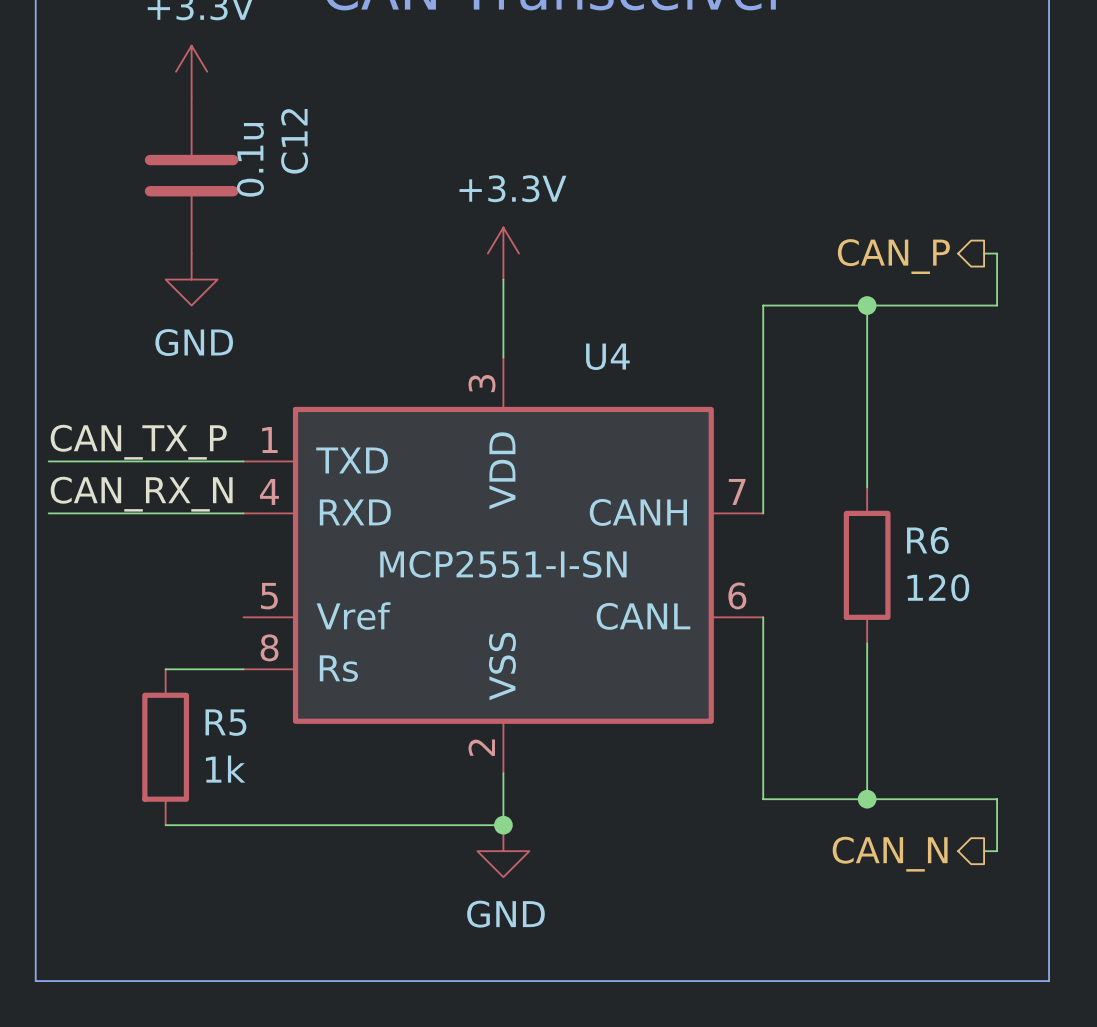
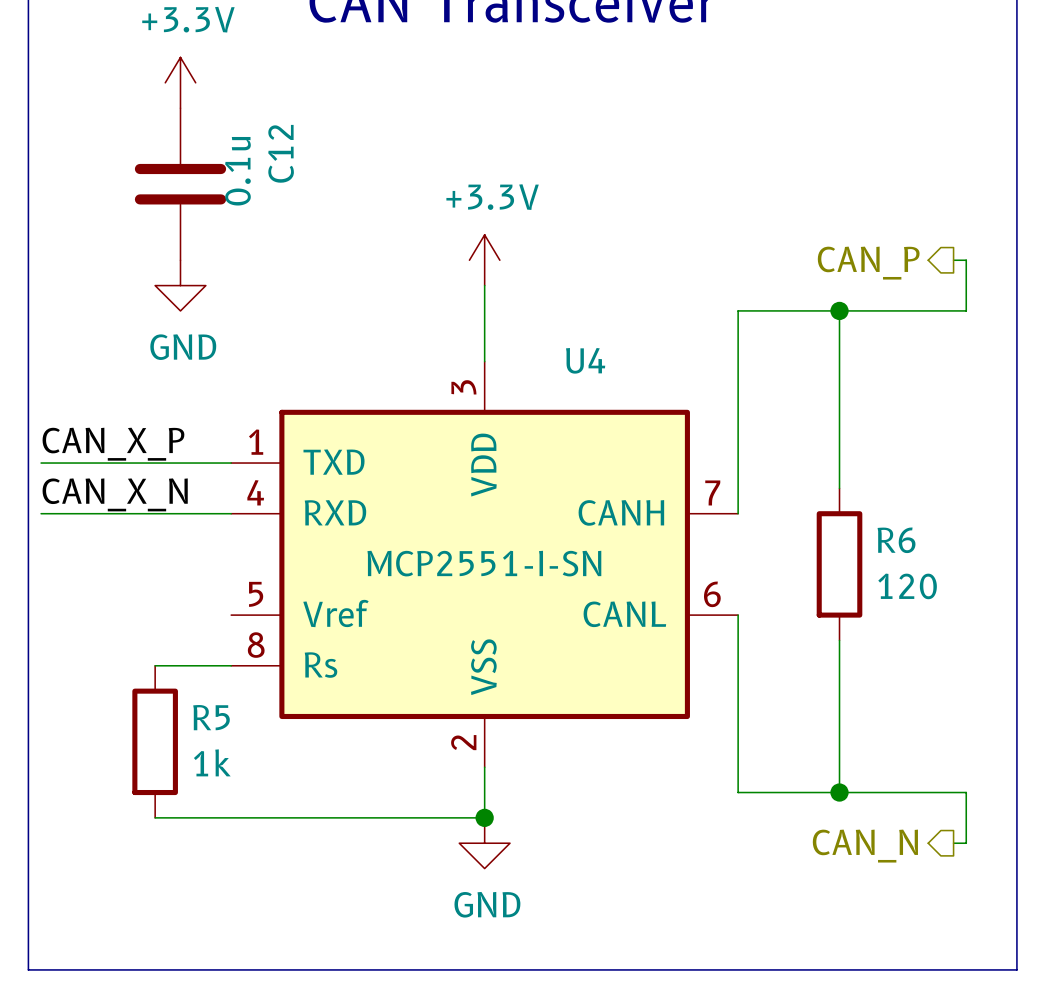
label: CAN_TX_P (138, 442) -> CAN_X_P (113, 444)
label: CAN_RX_N (141, 494) -> CAN_X_N (115, 494)

